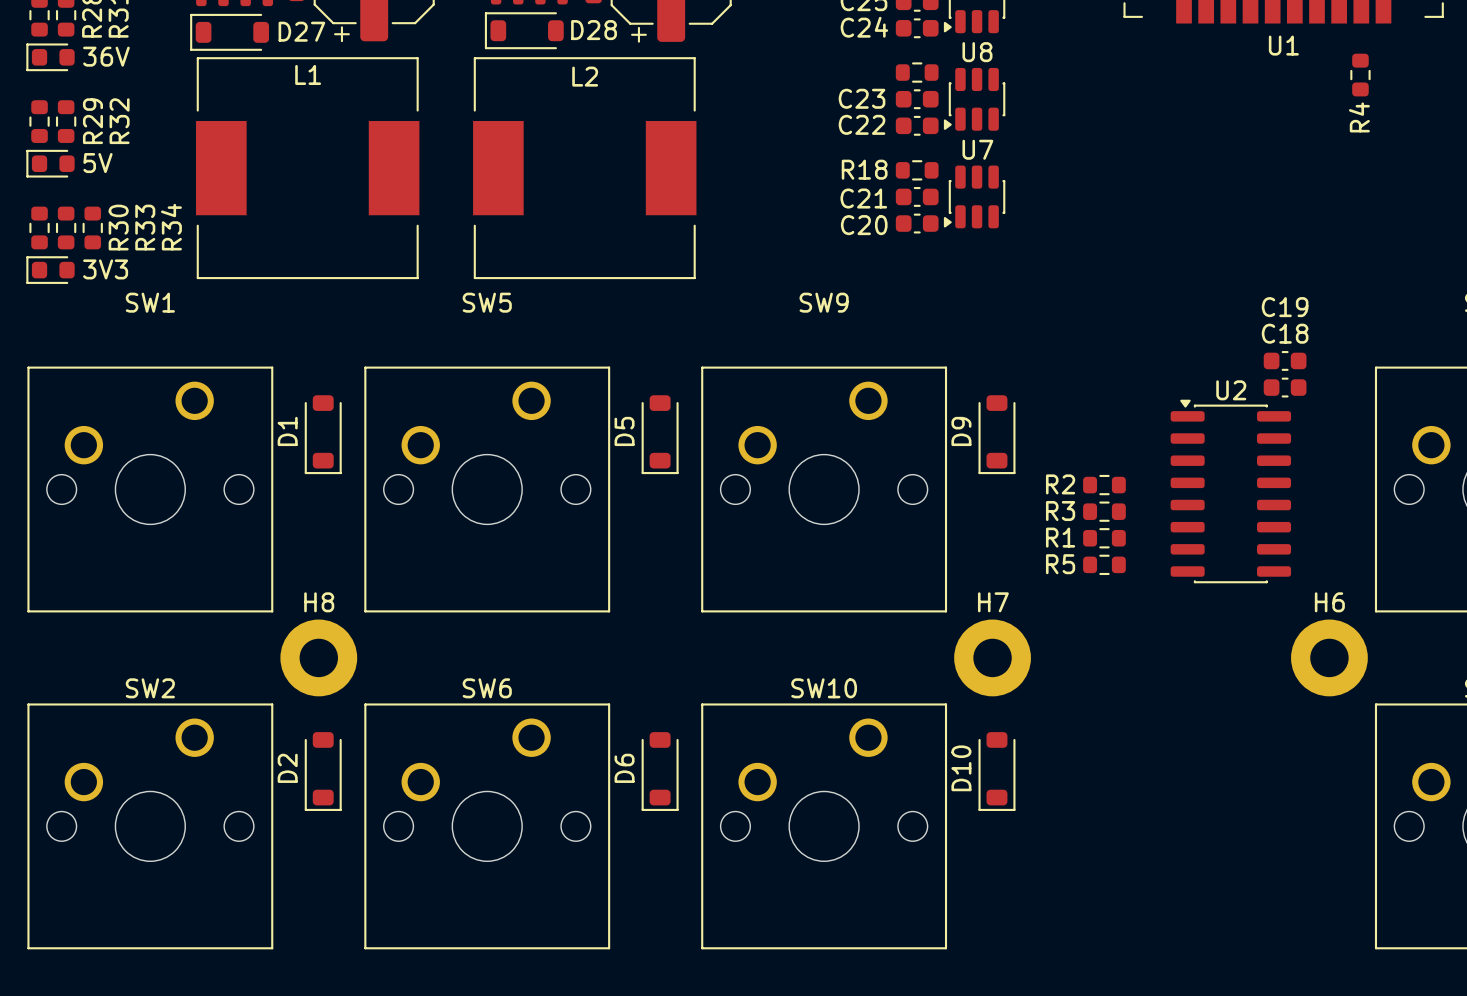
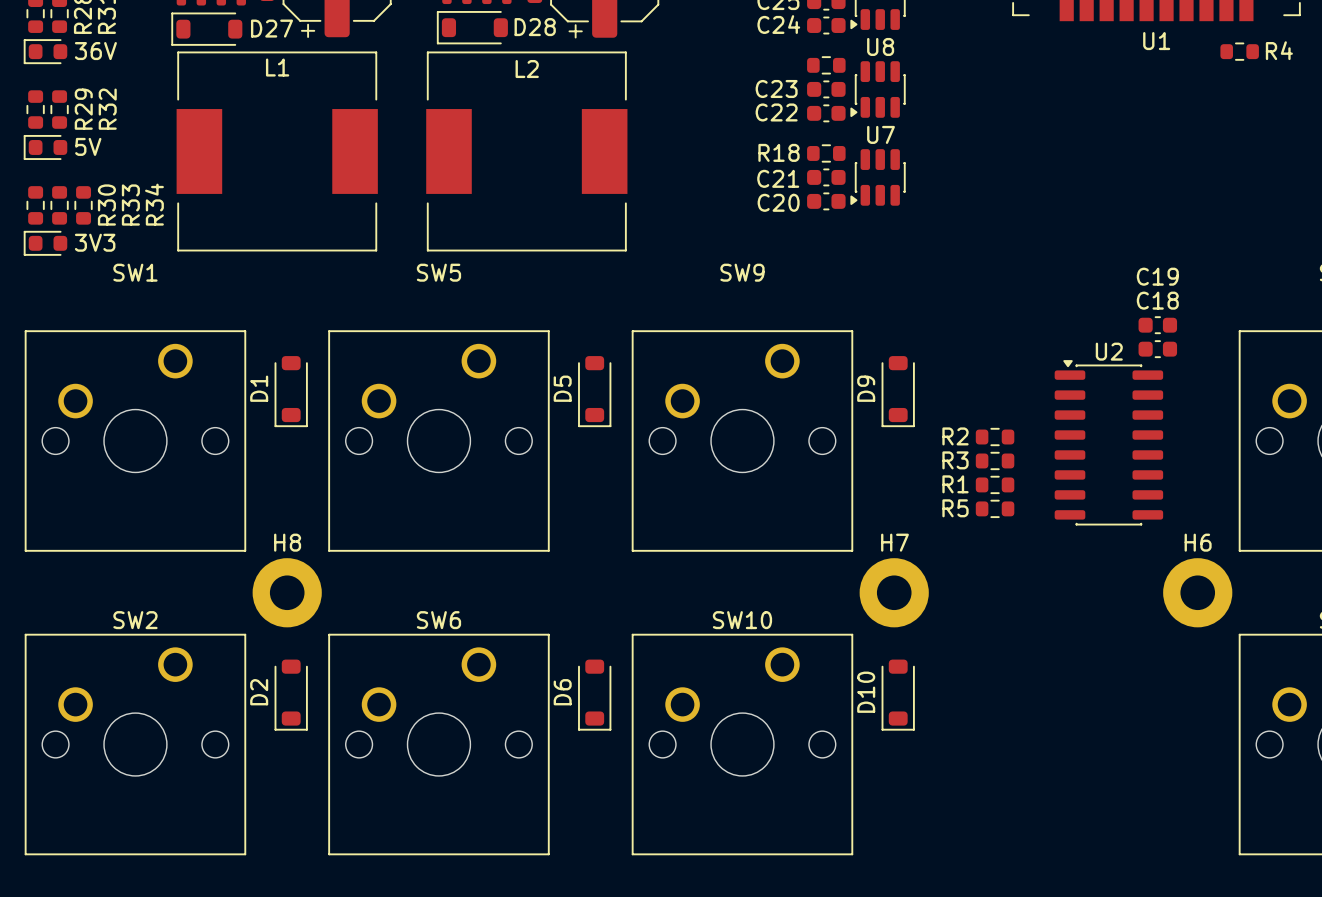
R4 rotation: 0° (1360, 75) -> 90° clockwise (1239, 51)
R4 name position: R4 (1359, 117) -> R4 (1279, 50)

